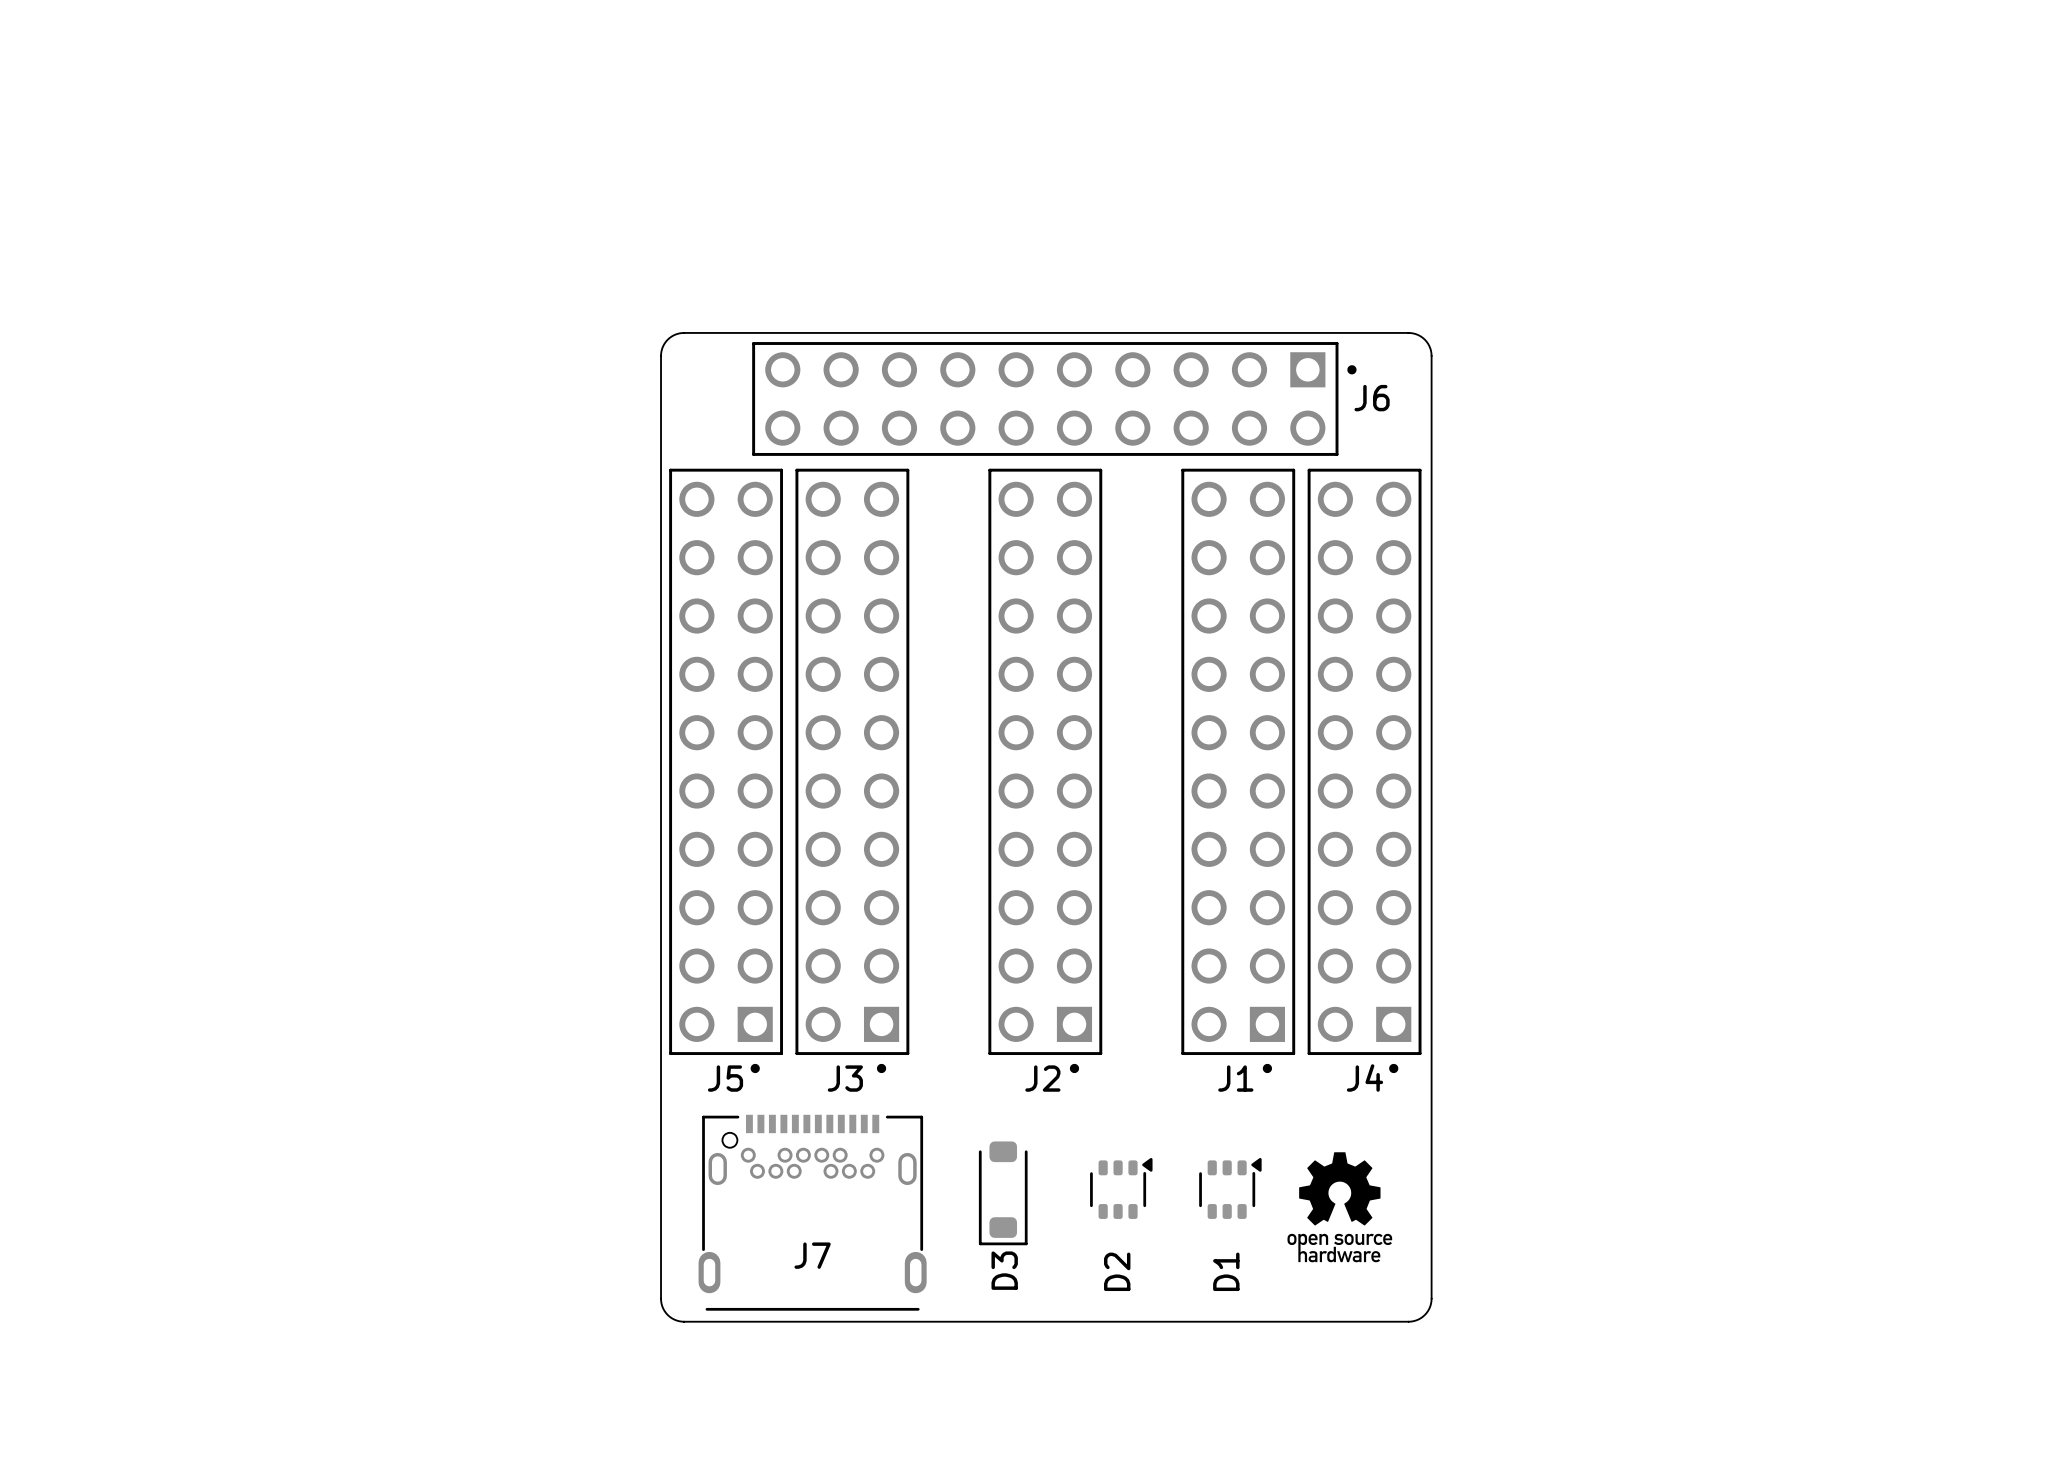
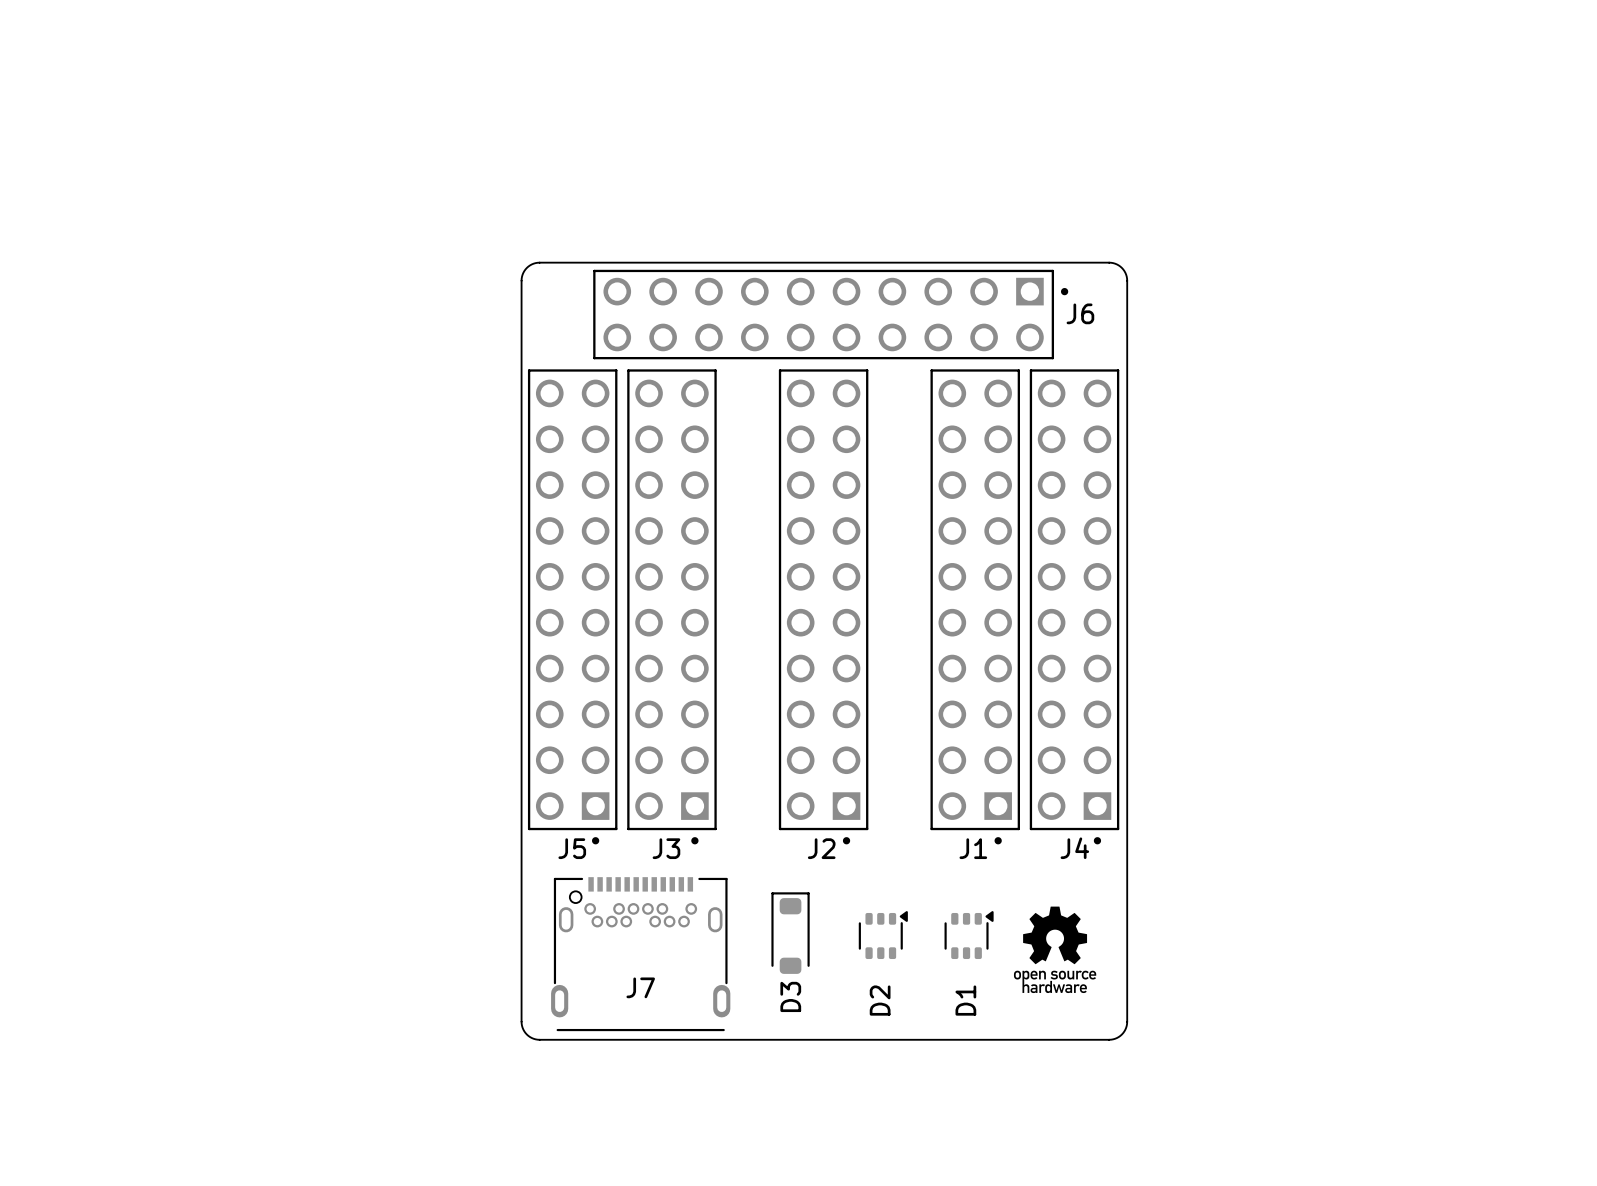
D3 rotation: 0° (1003, 1193) -> 180° (790, 933)

